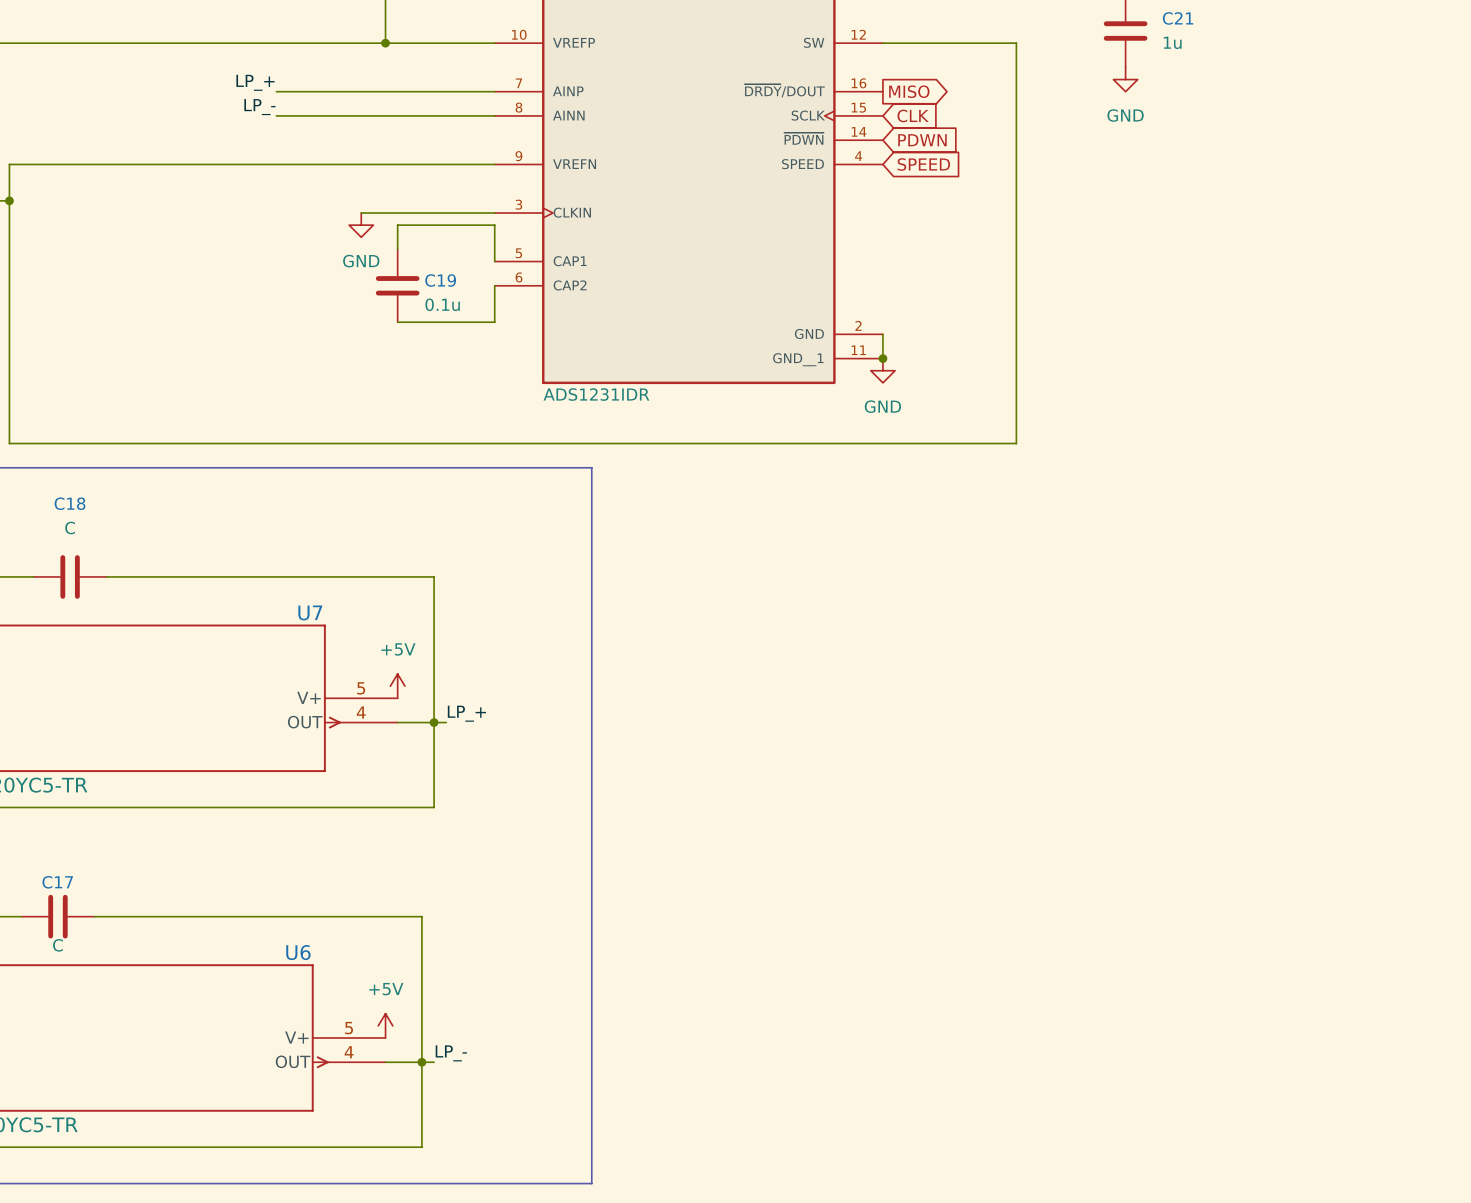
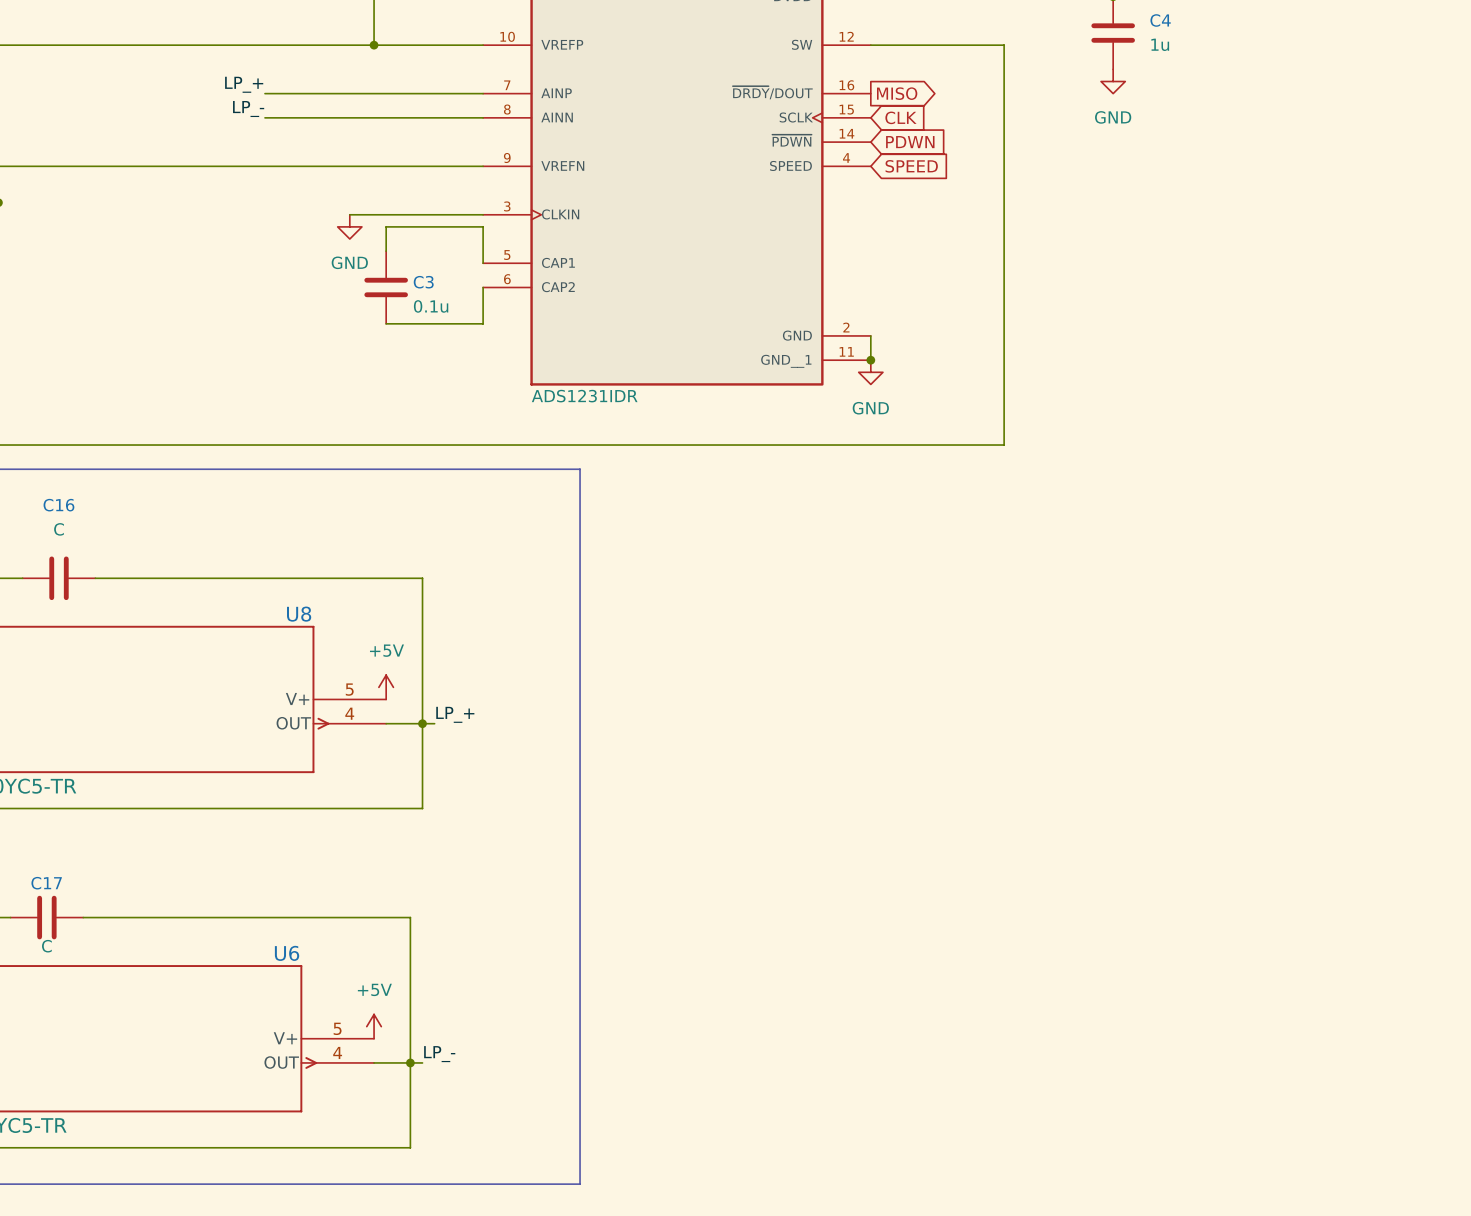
C21 name: C21 (1178, 18) -> C4 (1160, 20)
C19 name: C19 (440, 280) -> C3 (423, 282)
C18 name: C18 (69, 503) -> C16 (58, 505)
U7 name: U7 (310, 612) -> U8 (299, 614)

